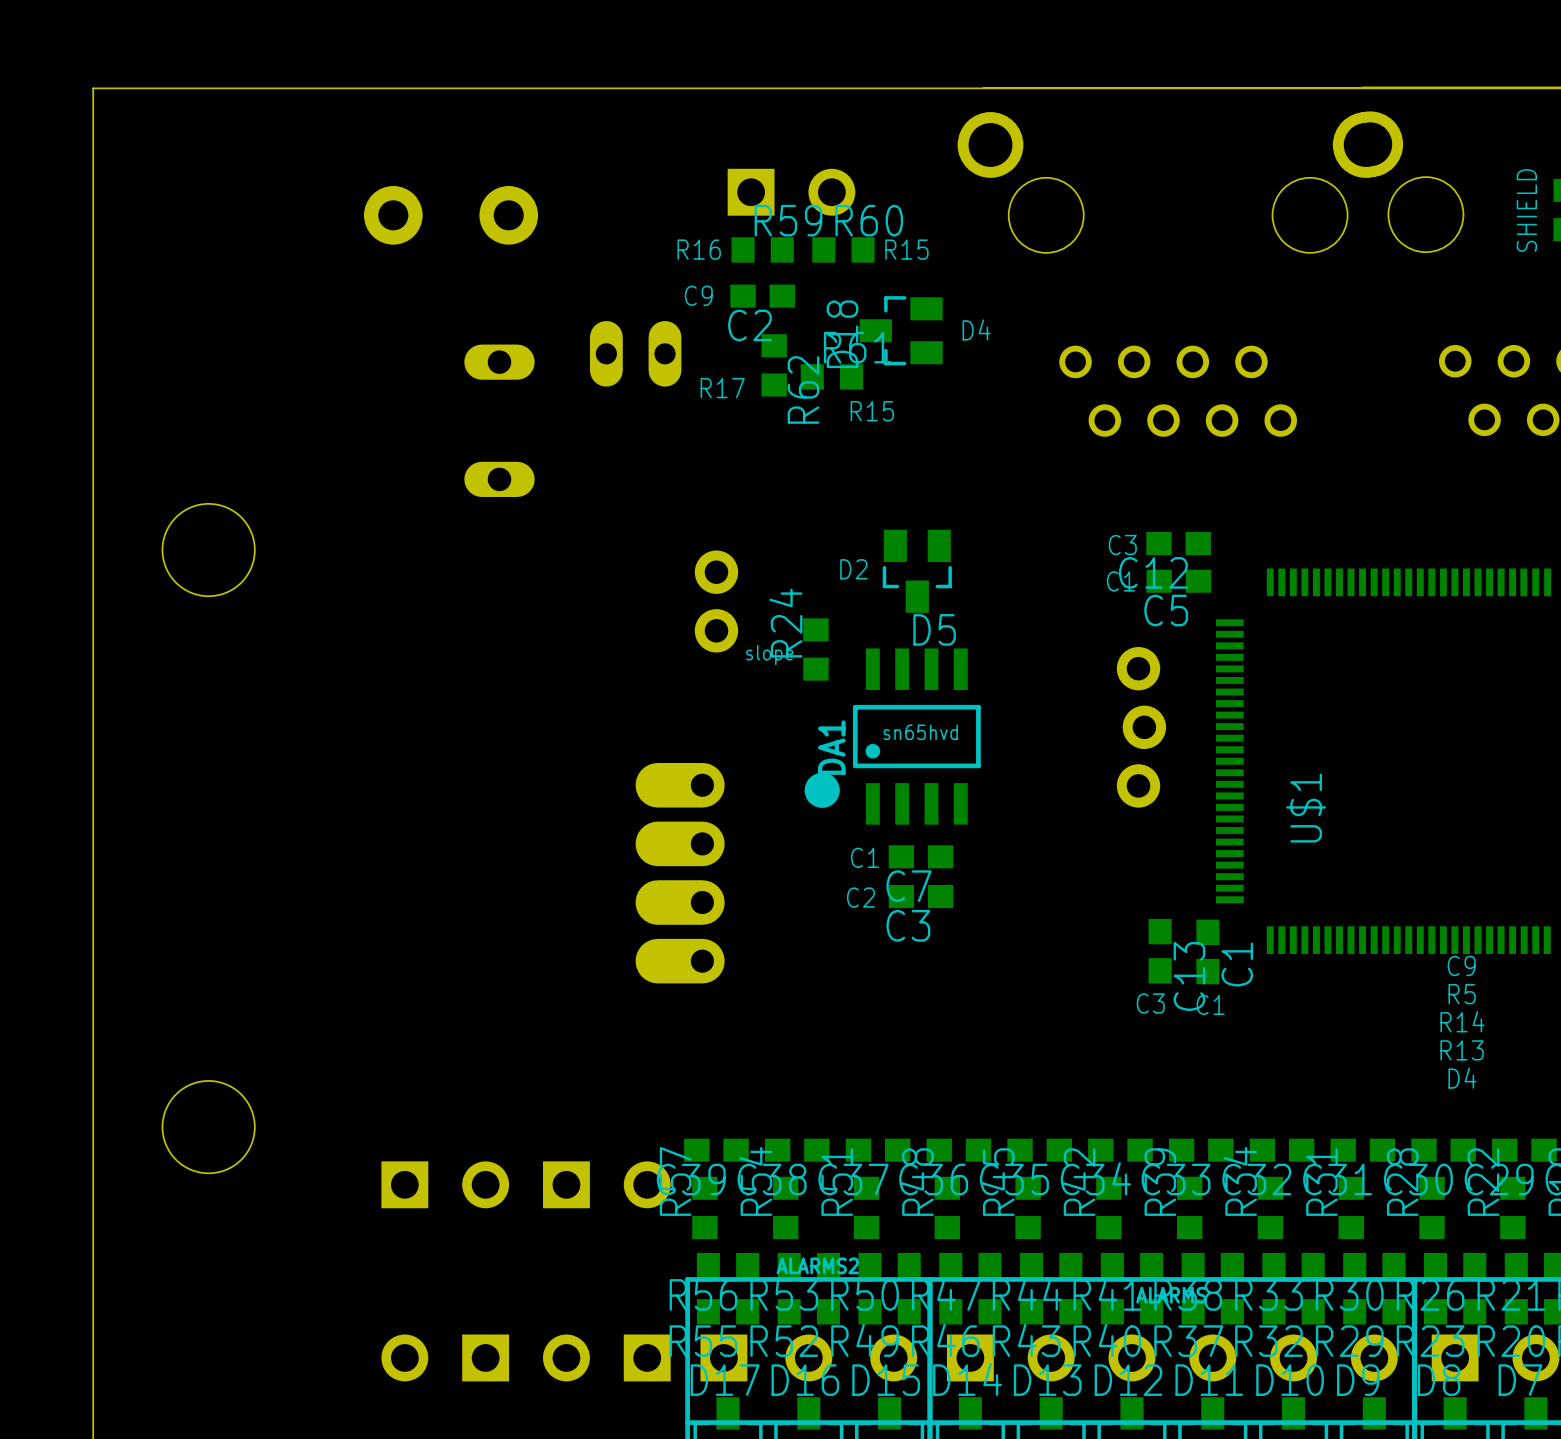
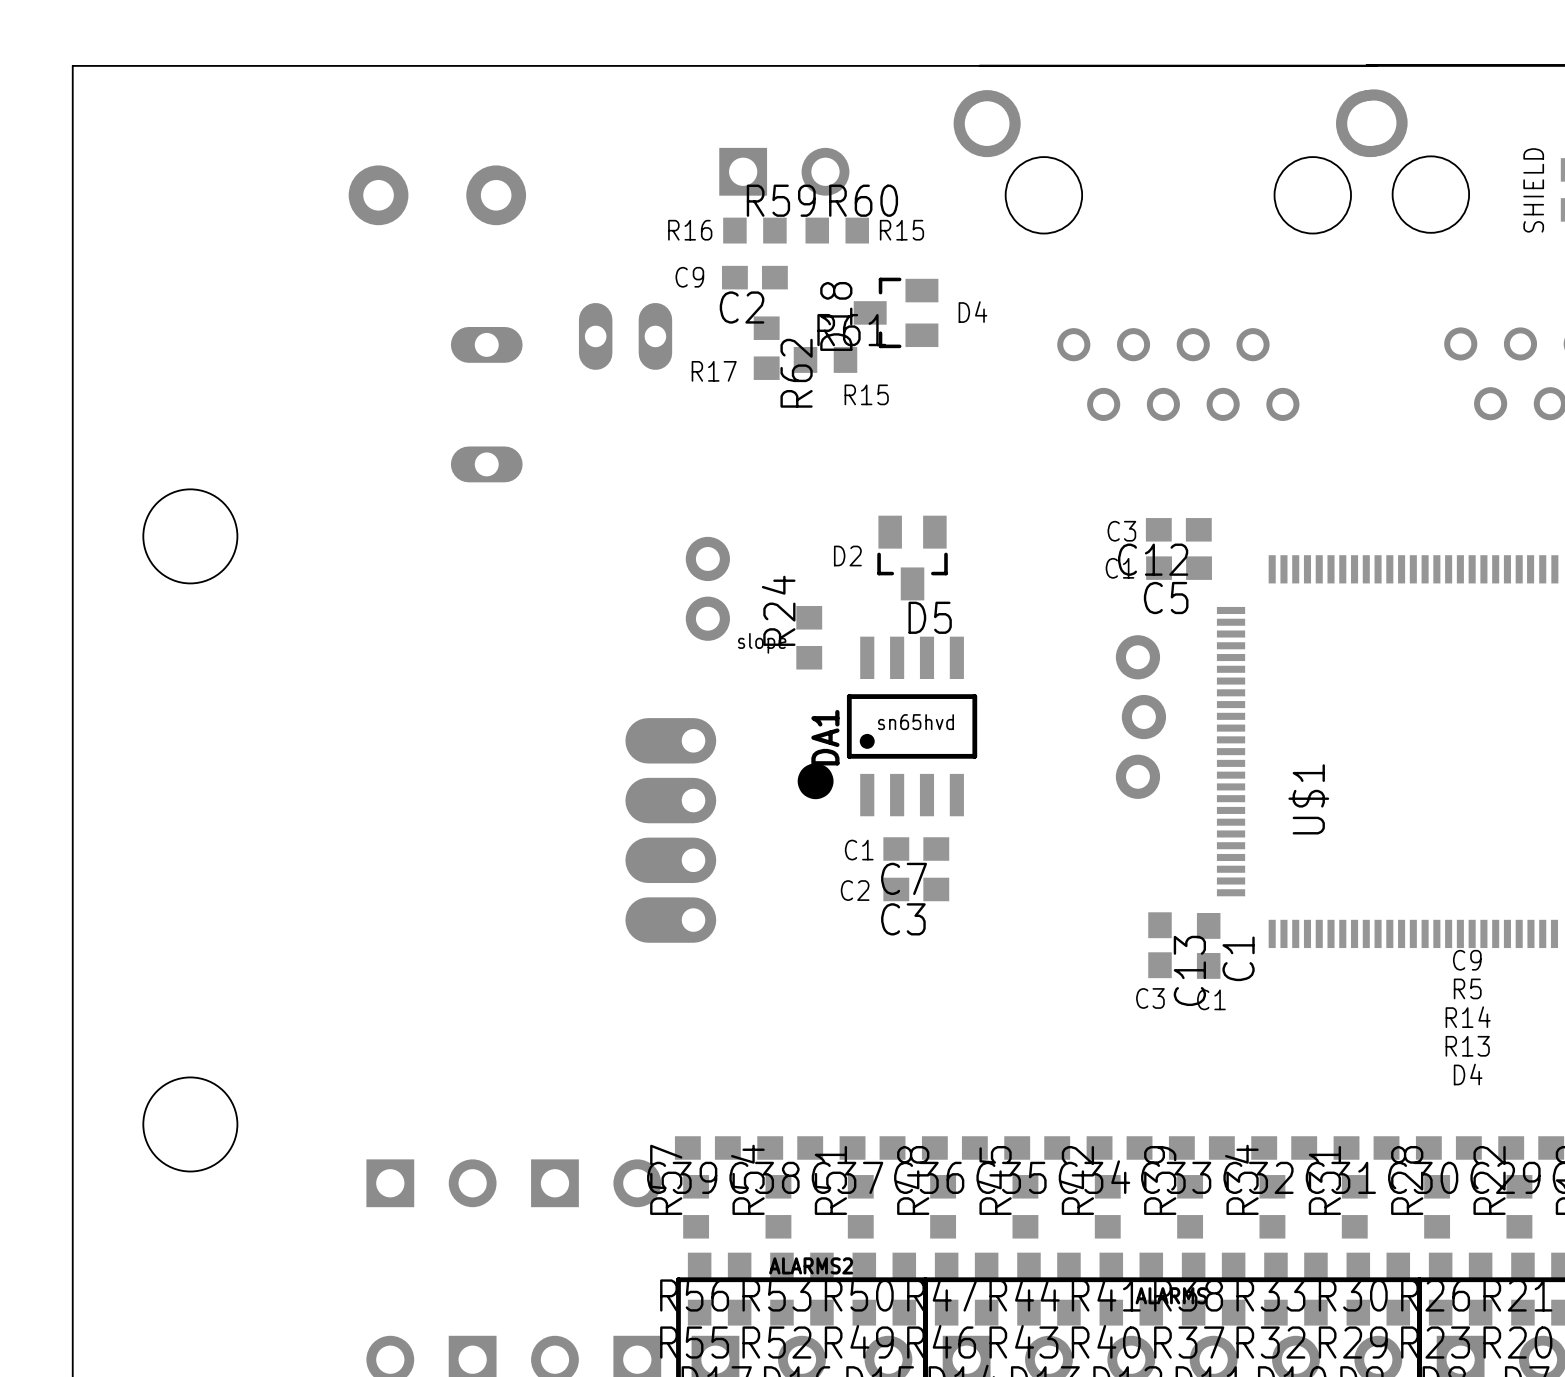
part position: (680, 873) -> (670, 830)

